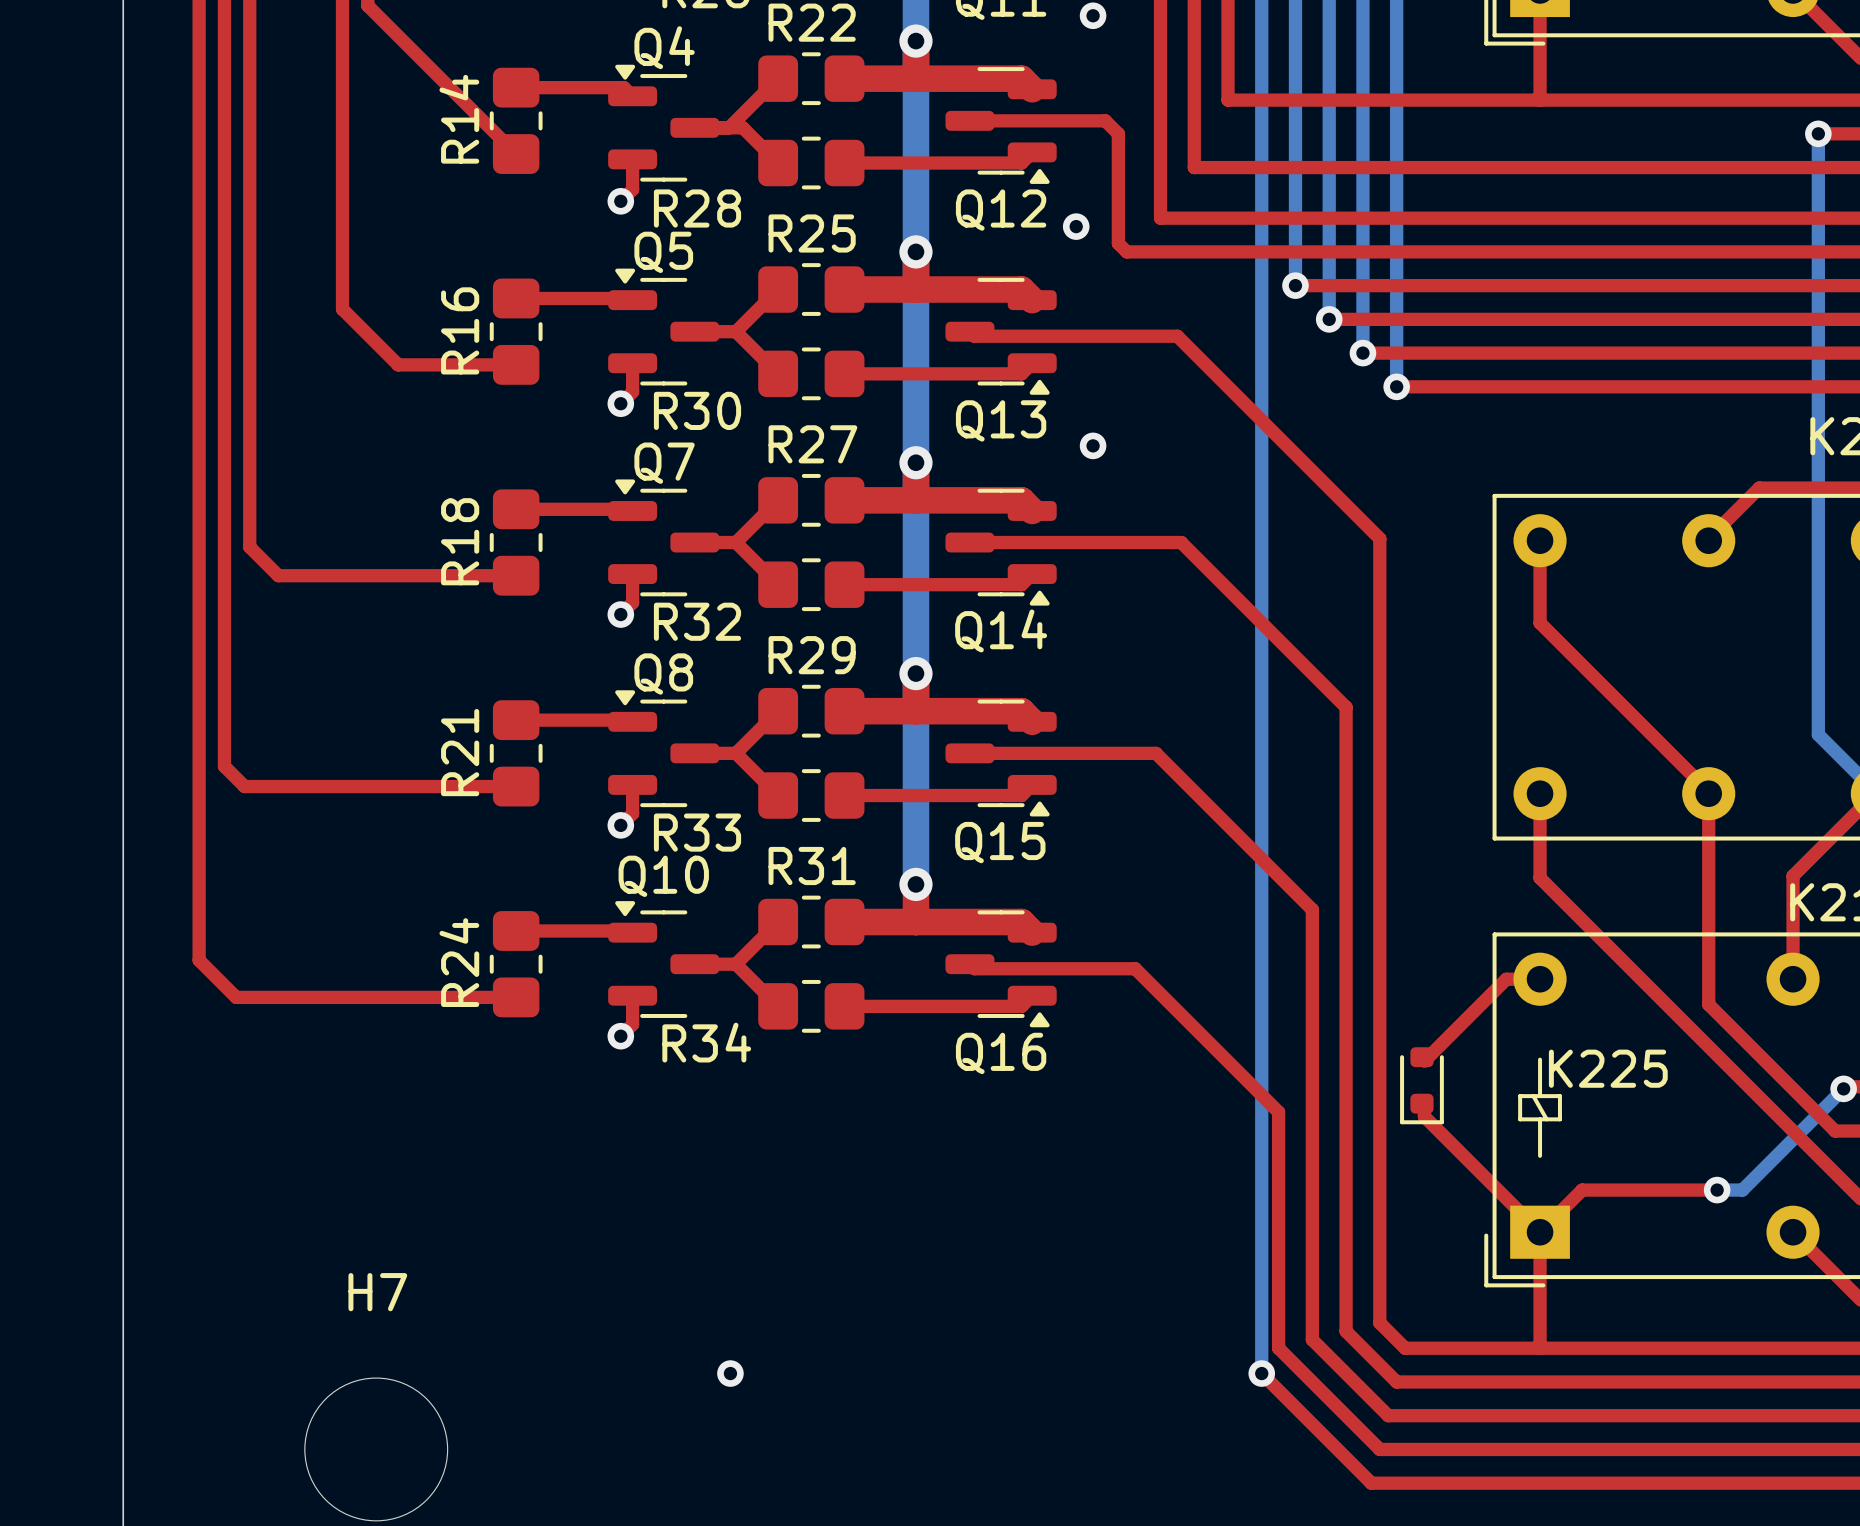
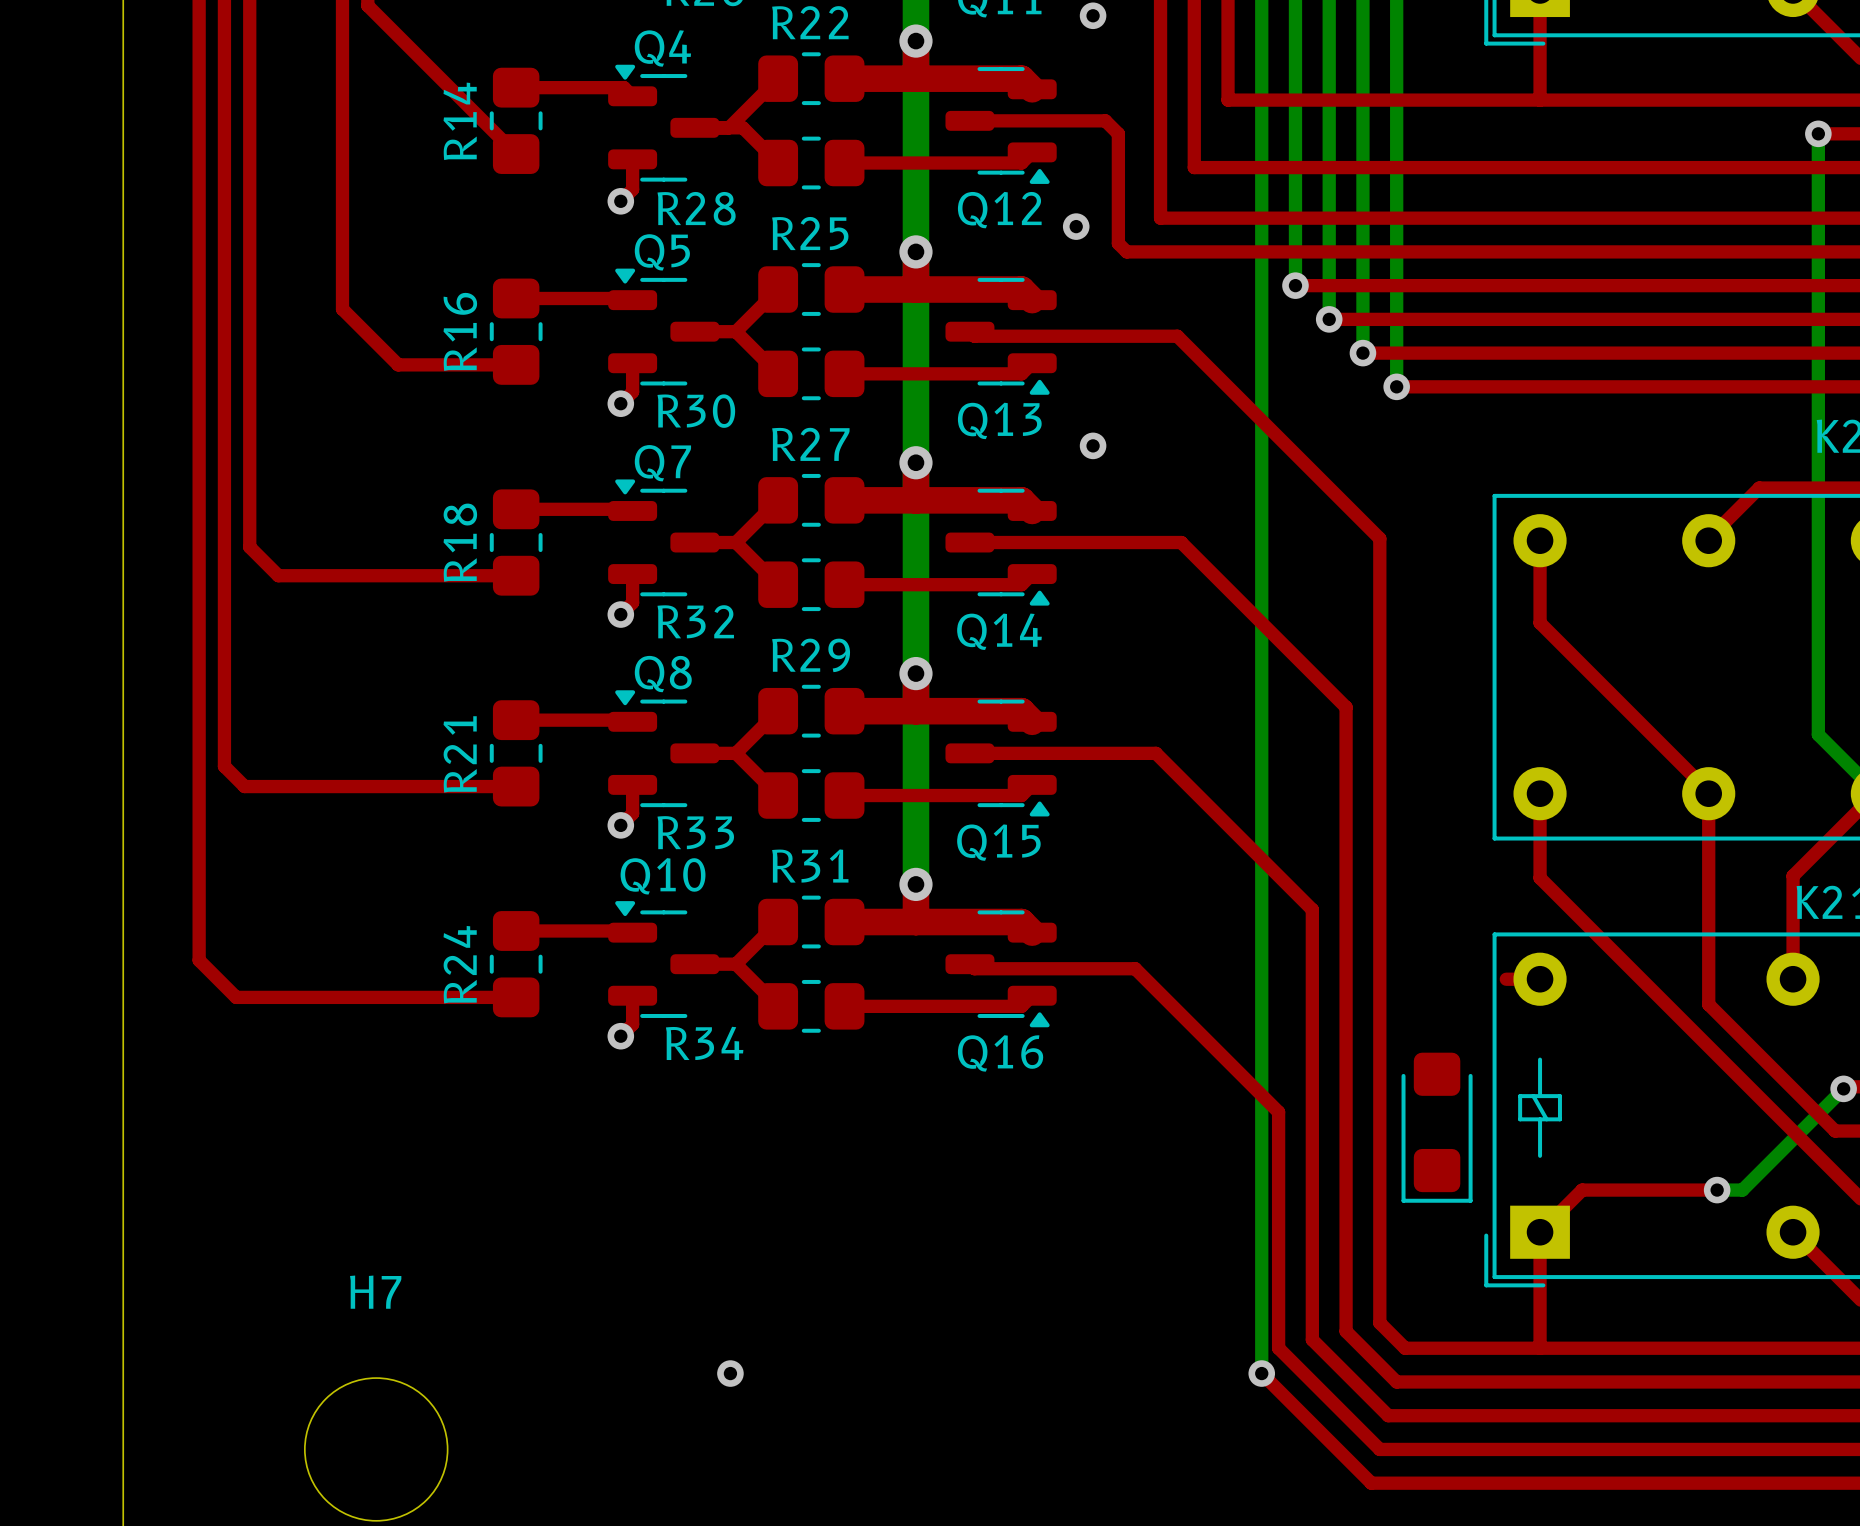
top track: (1506, 979) (1424, 1061) -> none
K225 name: K225 (1608, 1068) -> none
part: (1421, 1085) -> none
top track: (1424, 1107) (1424, 1116) (1540, 1232) -> none
part: none -> (1437, 1127)

